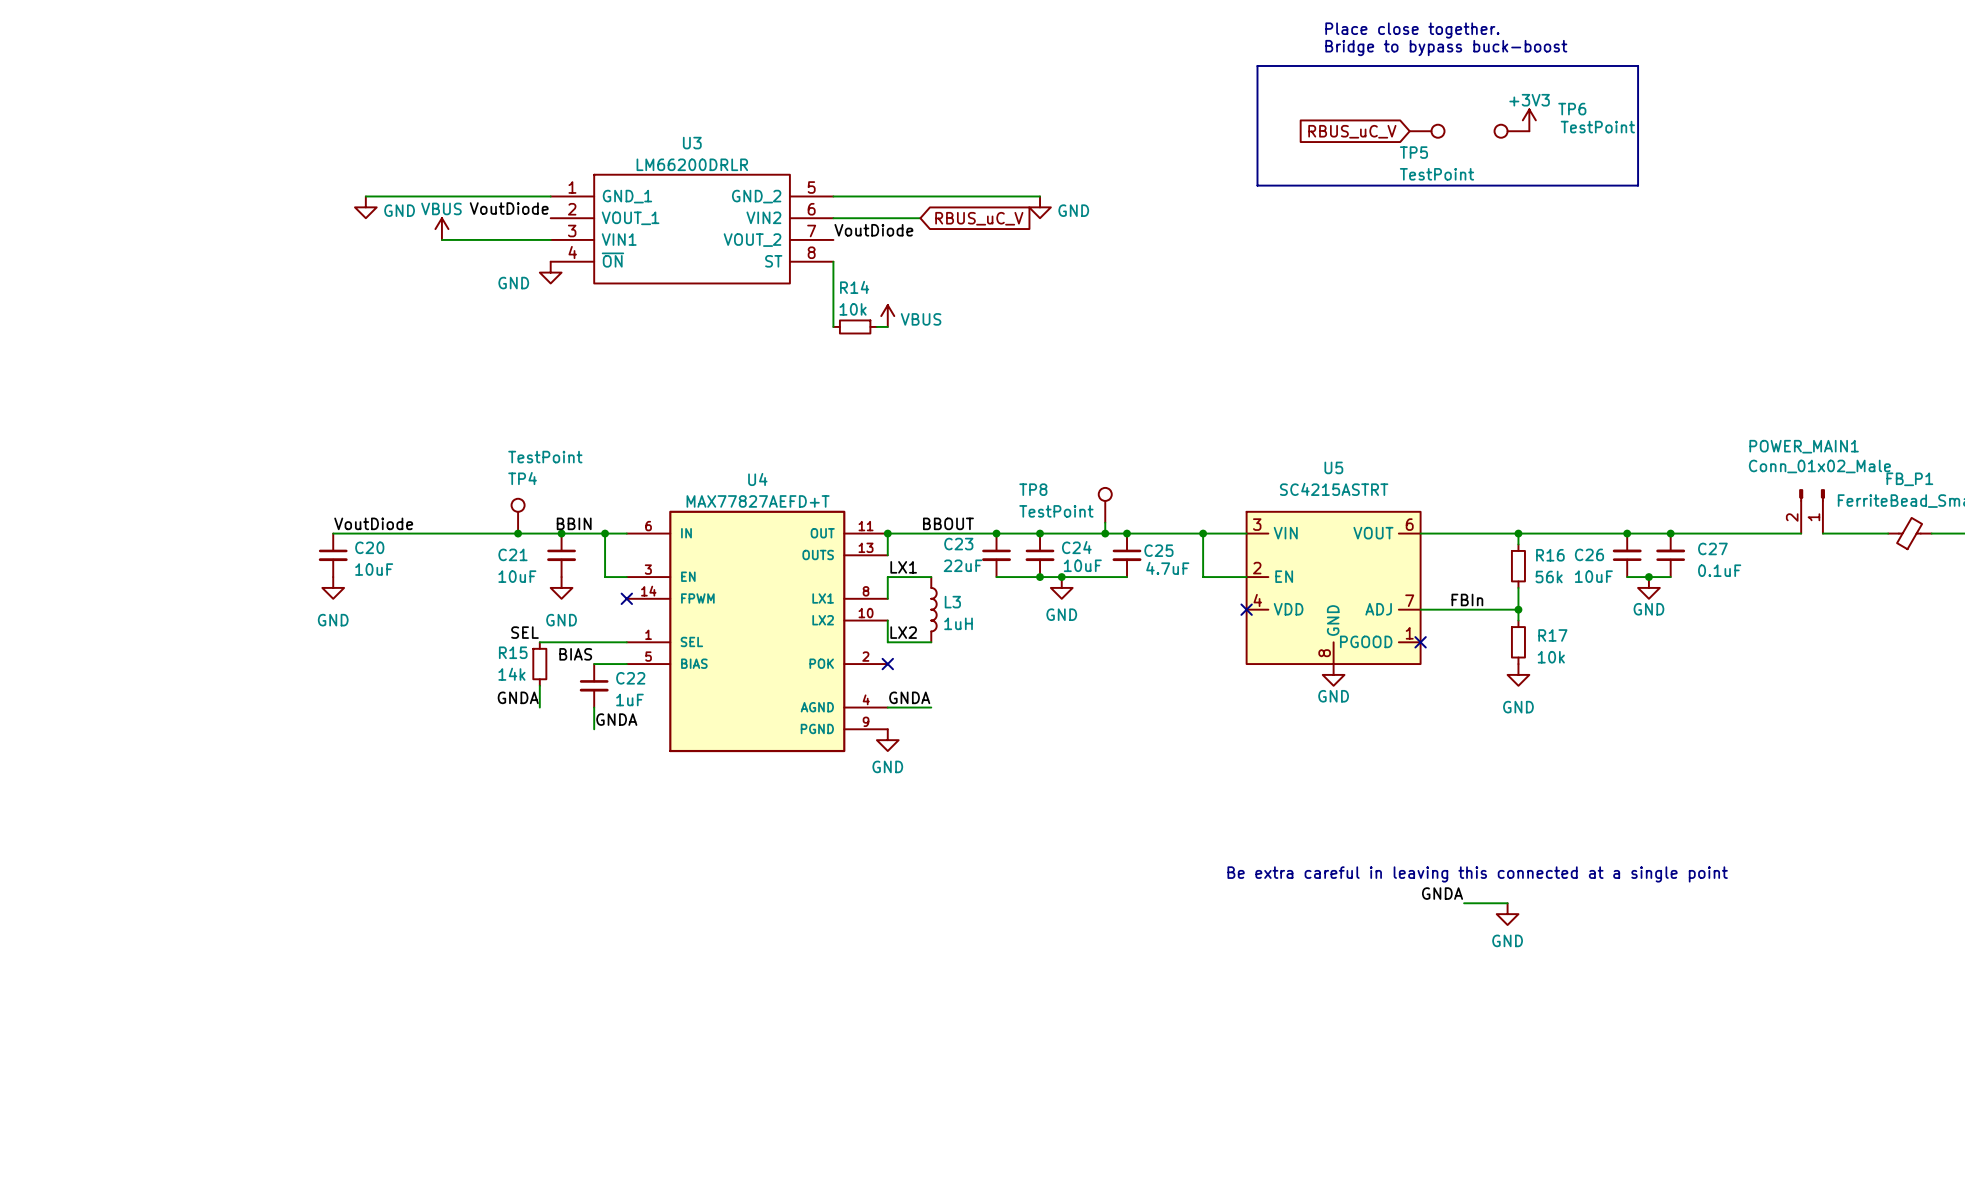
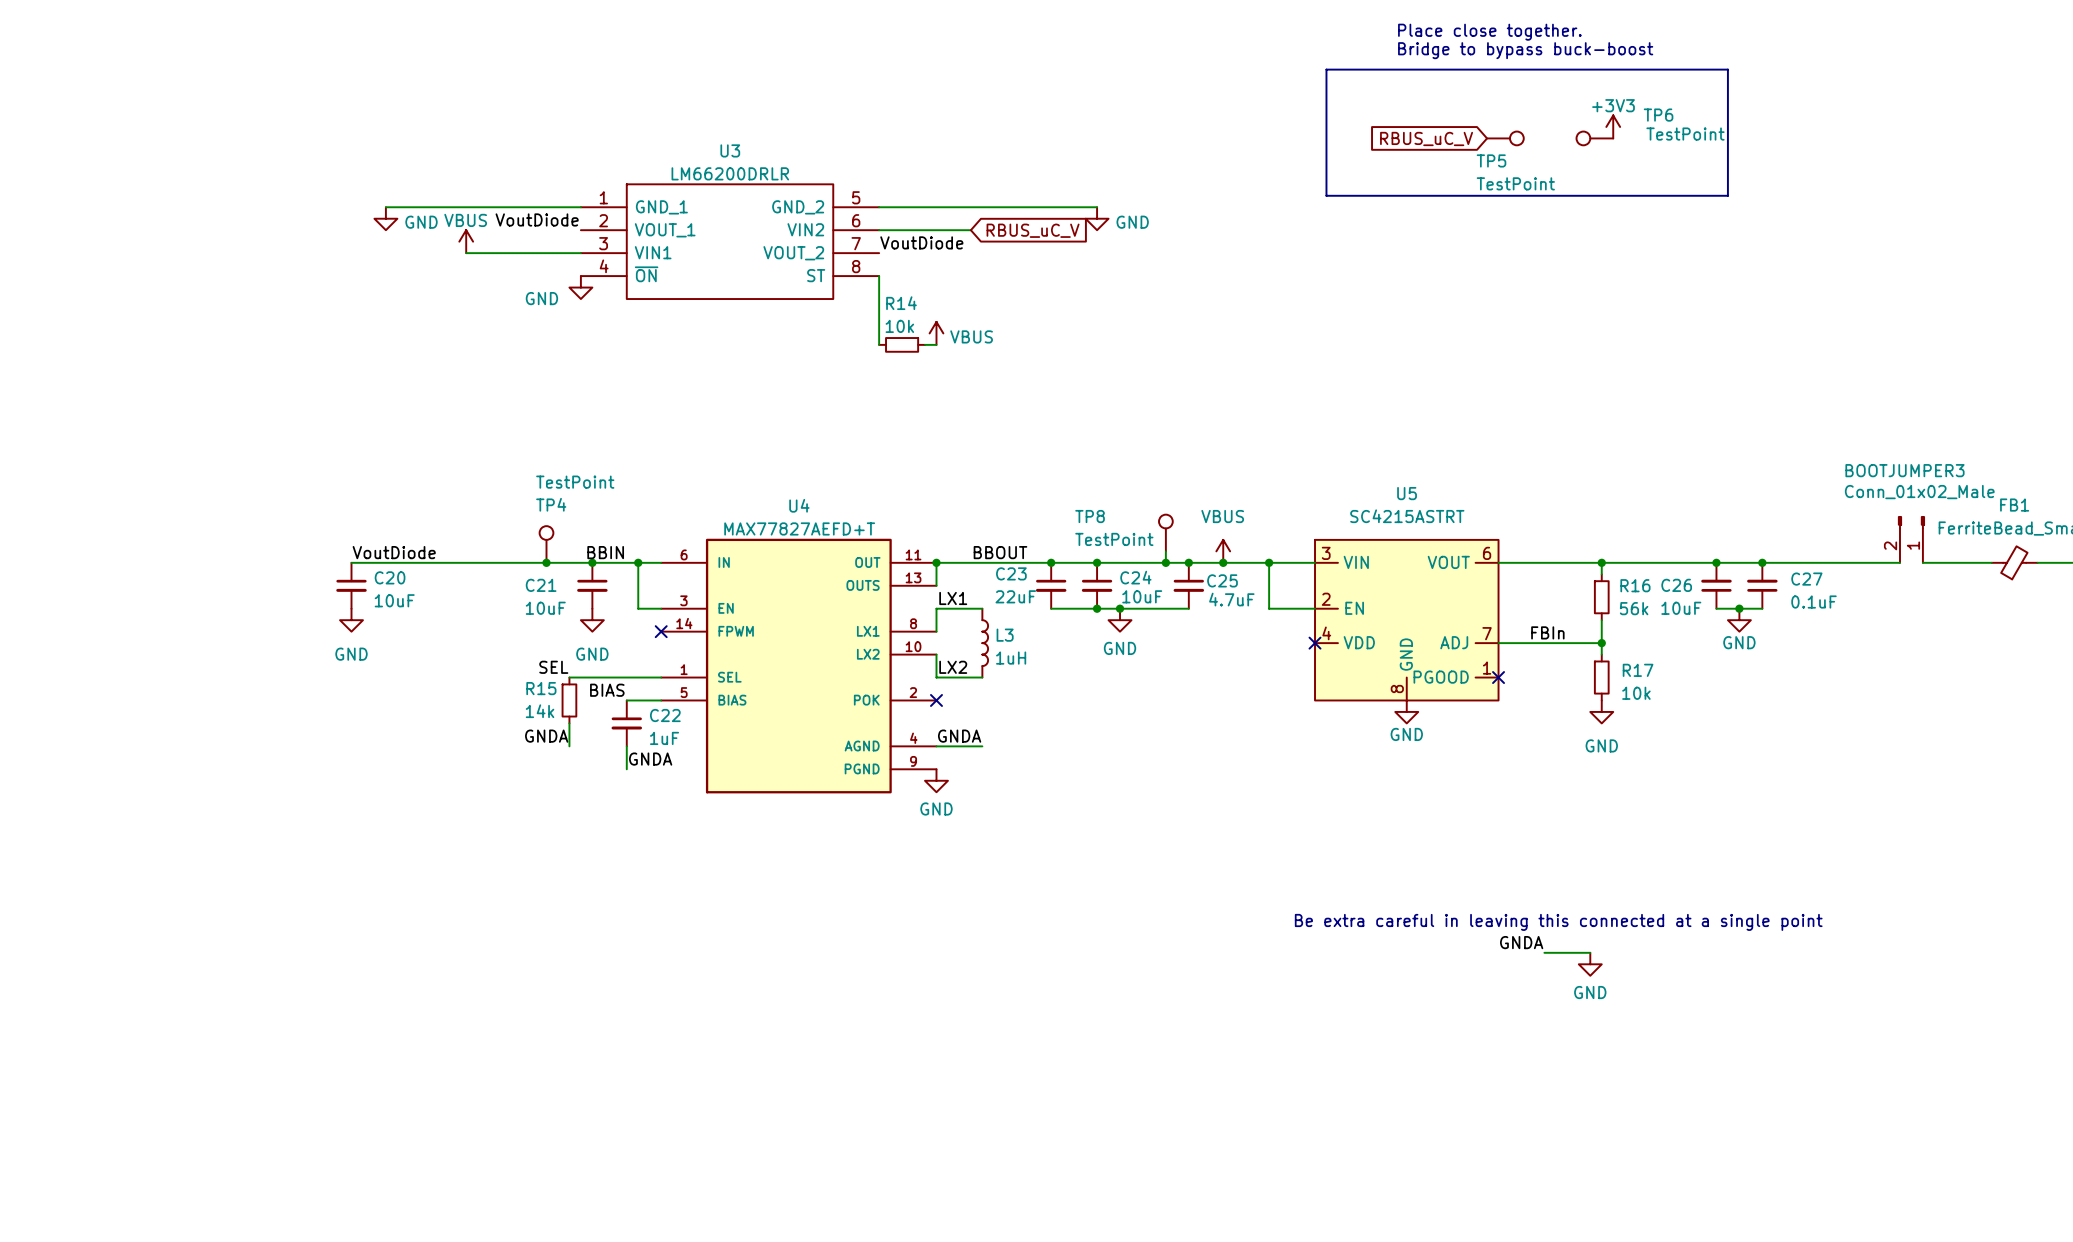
POWER_MAIN1 name: POWER_MAIN1 (1804, 446) -> BOOTJUMPER3 (1904, 470)
FB_P1 name: FB_P1 (1909, 479) -> FB1 (2014, 505)
power symbol: none -> VBUS (1223, 551)
junction: none -> (1223, 562)

